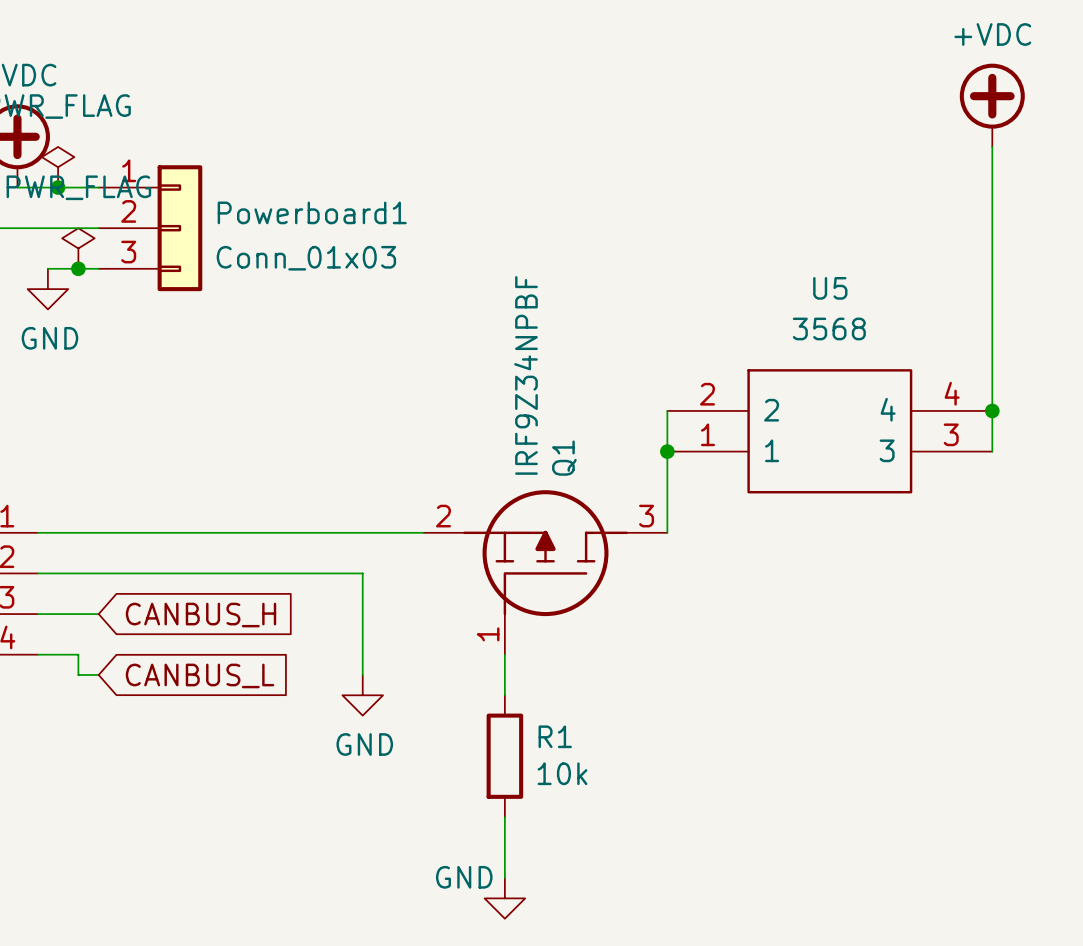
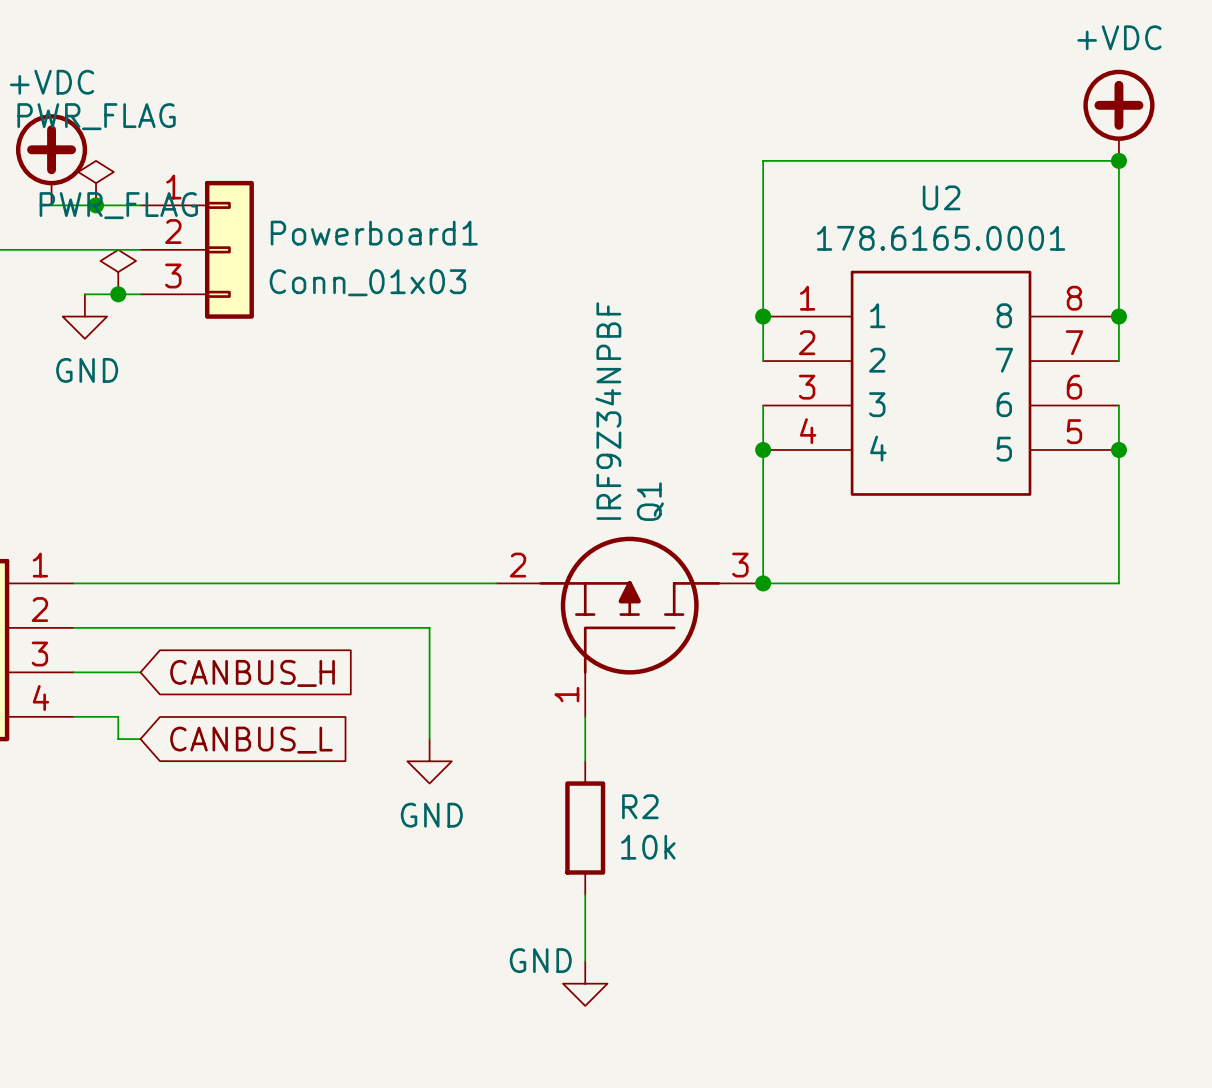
wire: none -> (1118, 160) (763, 160) (763, 361)
junction: none -> (1118, 160)
junction: none -> (763, 316)
junction: none -> (1118, 316)
wire: (992, 329) (992, 370) -> (763, 405) (763, 449)
U2: none -> 178.6165.0001 (941, 383)
junction: none -> (763, 449)
U5: 3568 (829, 431) -> none
junction: (667, 451) -> none
wire: none -> (1118, 494) (1118, 583) (763, 583)
junction: none -> (763, 583)
R1 name: R1 (555, 736) -> R2 (640, 806)

